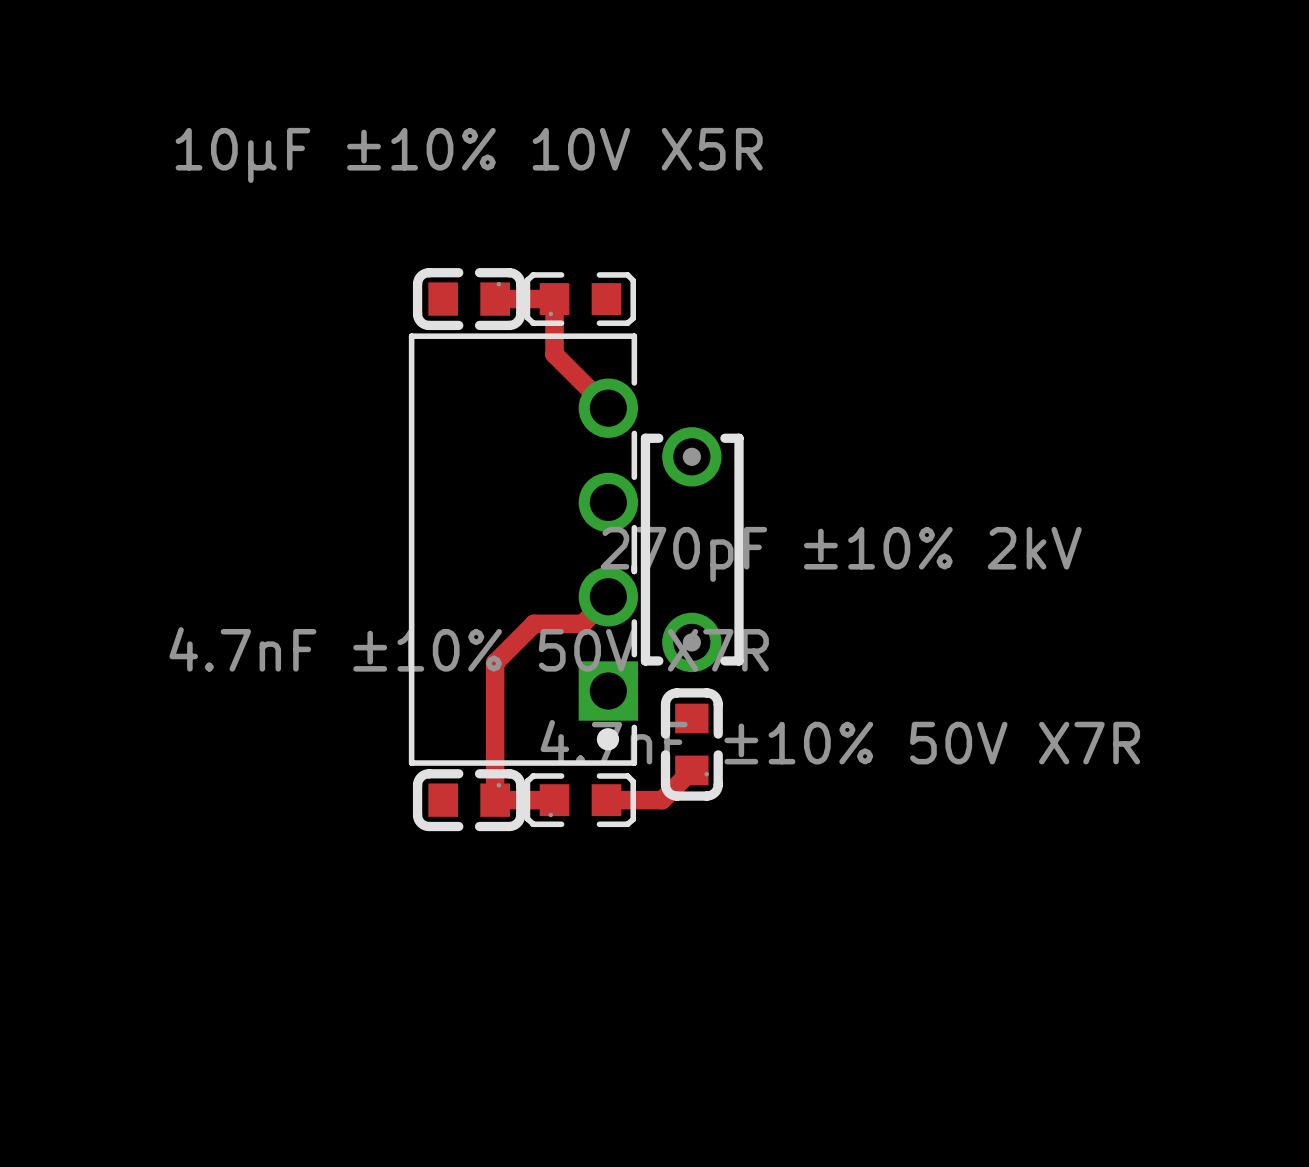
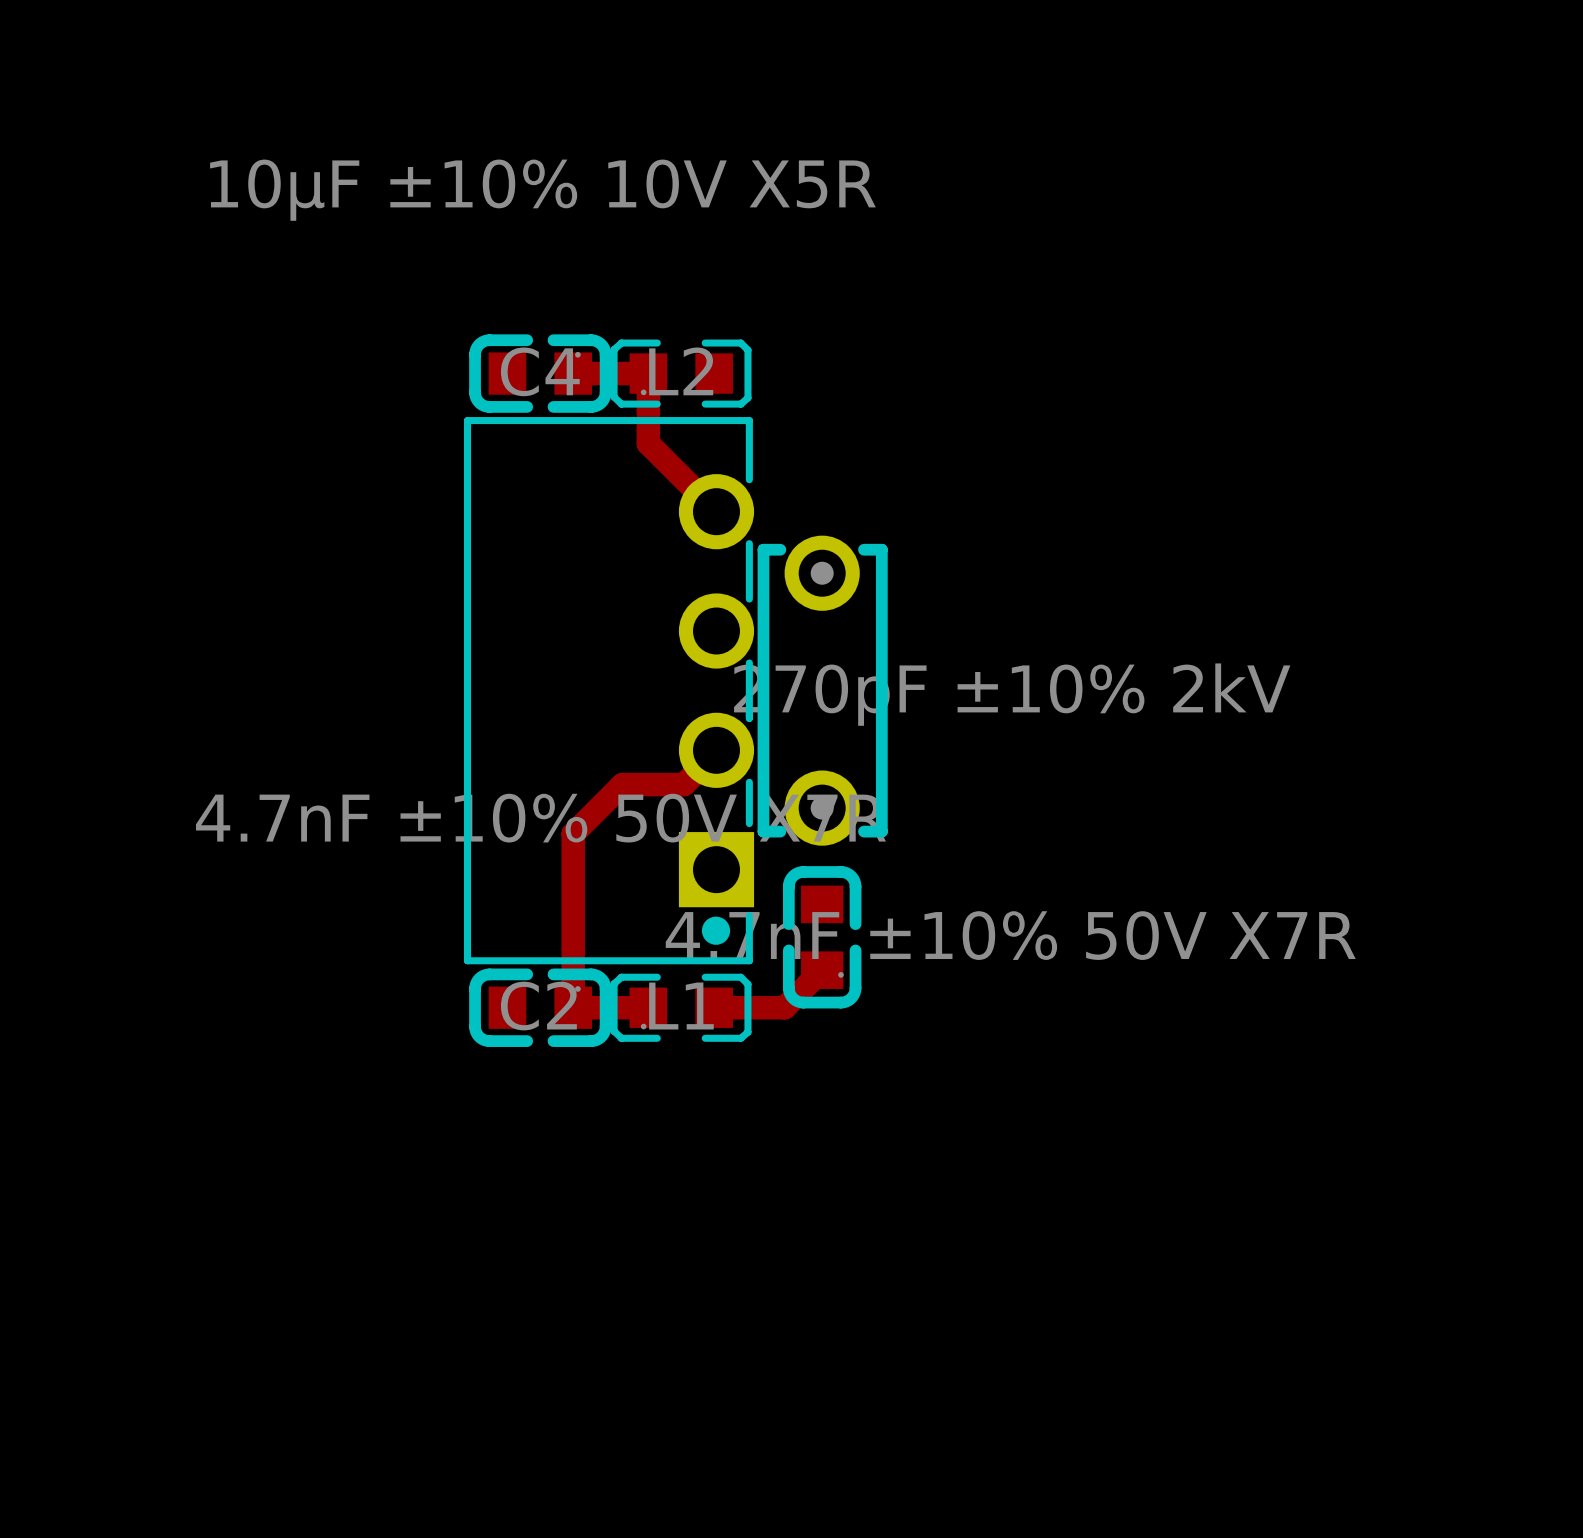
C4 name: none -> C4 (540, 371)
L2 name: none -> L2 (681, 371)
C2 name: none -> C2 (538, 1006)
L1 name: none -> L1 (681, 1006)

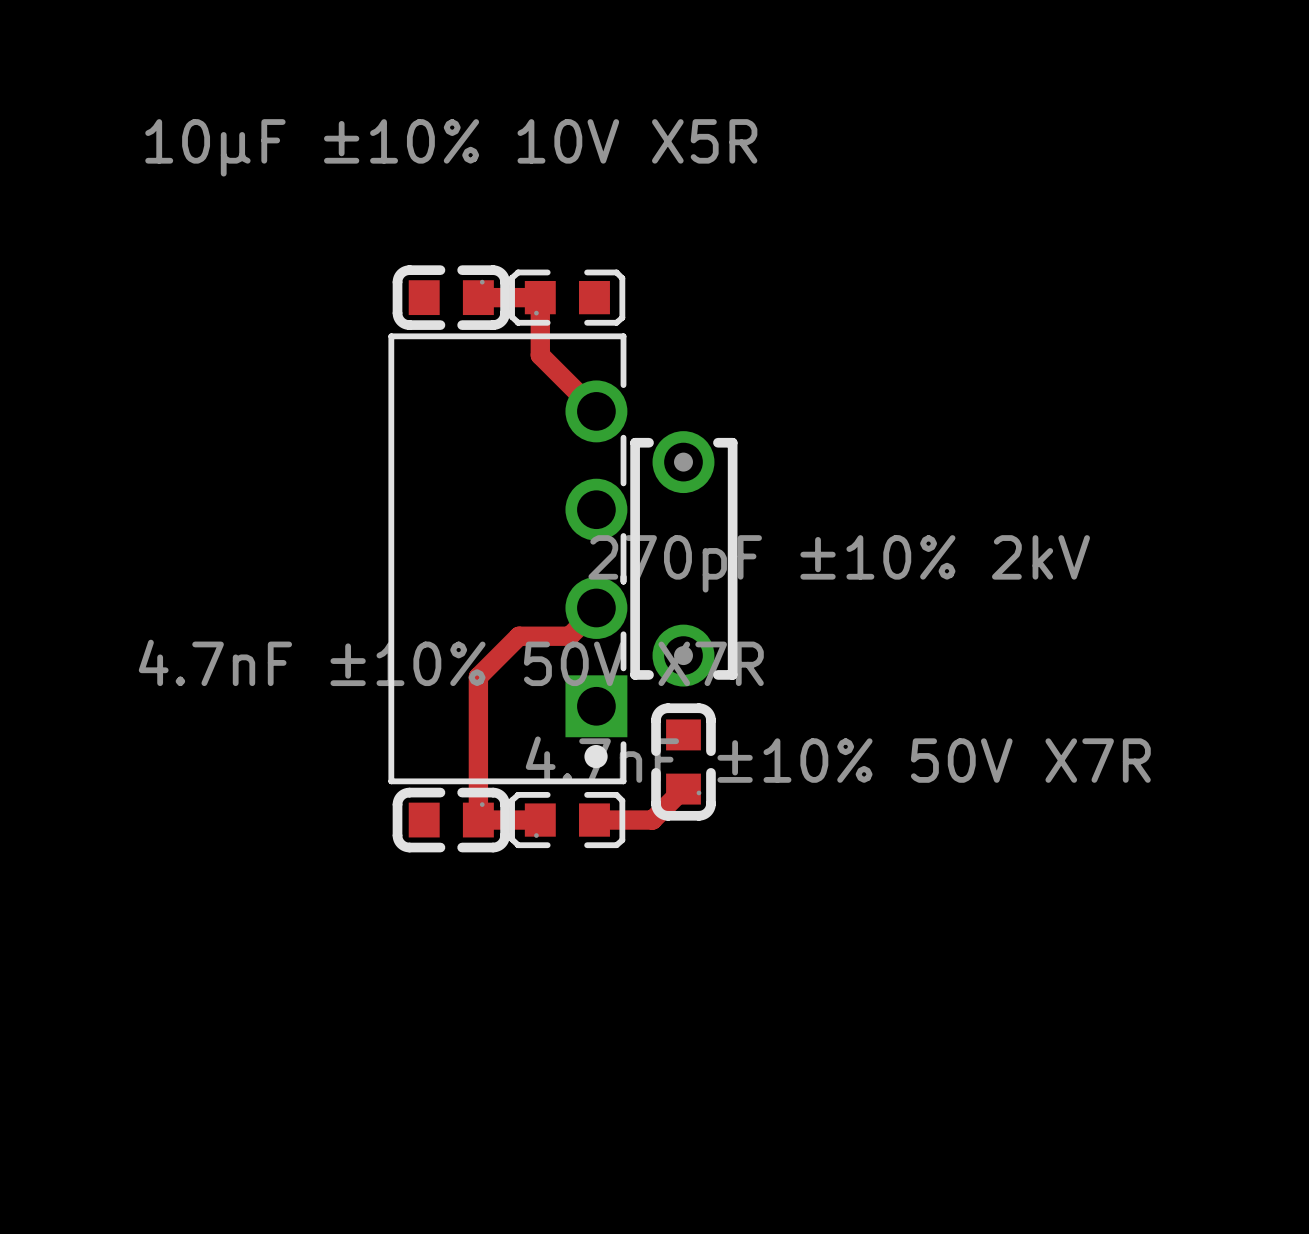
C4 name: C4 (540, 371) -> none
L2 name: L2 (681, 371) -> none
C2 name: C2 (538, 1006) -> none
L1 name: L1 (681, 1006) -> none

